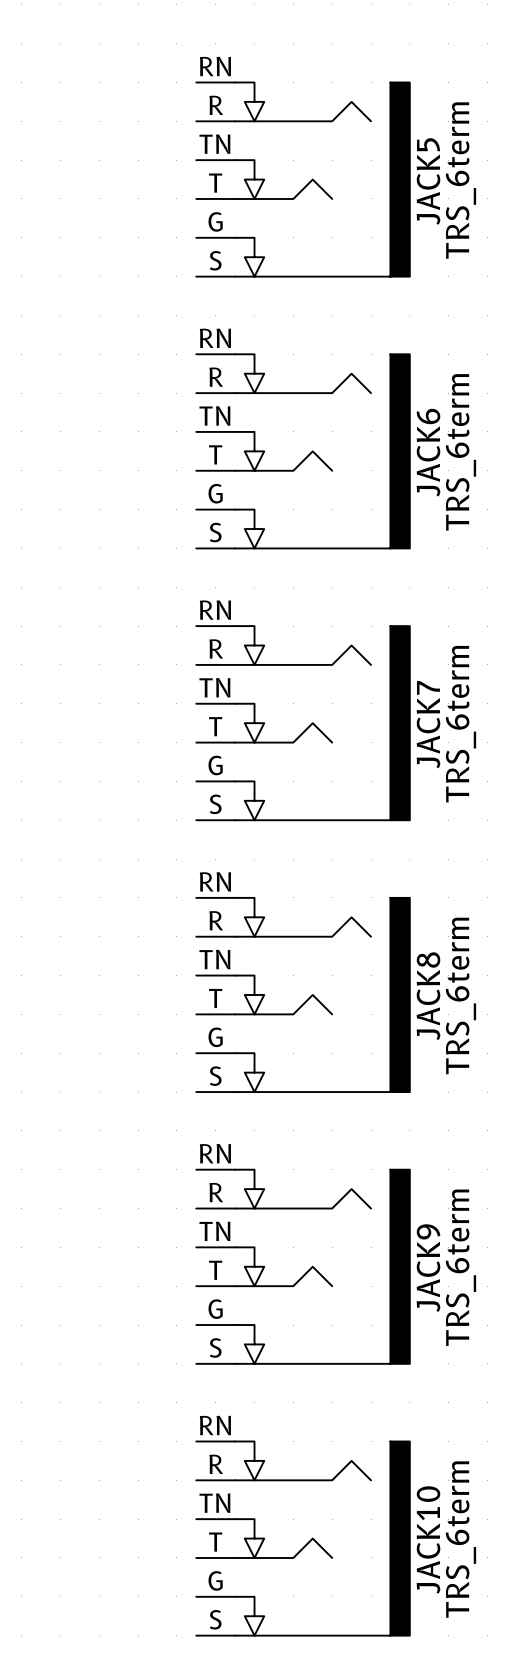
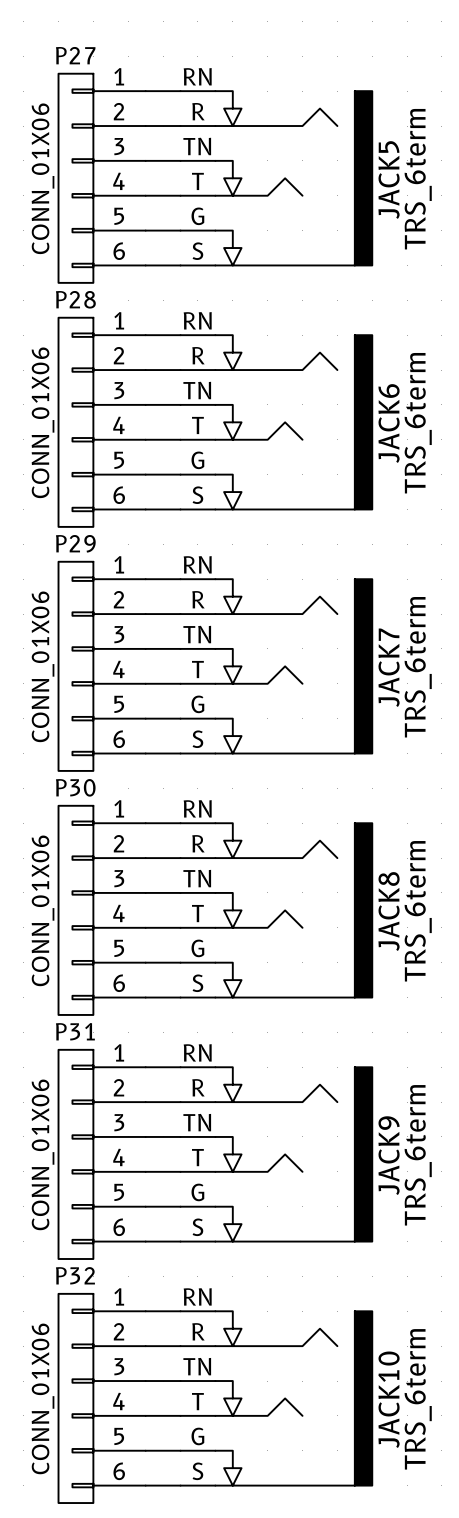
wire: none -> (145, 91) (180, 91)
wire: none -> (145, 126) (180, 126)
wire: none -> (145, 160) (180, 160)
P27: none -> CONN_01X06 (102, 178)
wire: none -> (145, 195) (180, 195)
wire: none -> (145, 230) (180, 230)
wire: none -> (145, 265) (180, 265)
wire: none -> (145, 335) (180, 335)
wire: none -> (145, 370) (180, 370)
wire: none -> (145, 404) (180, 404)
P28: none -> CONN_01X06 (102, 422)
wire: none -> (145, 439) (180, 439)
wire: none -> (145, 474) (180, 474)
wire: none -> (145, 509) (180, 509)
wire: none -> (145, 579) (180, 579)
wire: none -> (145, 614) (180, 614)
wire: none -> (145, 648) (180, 648)
P29: none -> CONN_01X06 (102, 666)
wire: none -> (145, 683) (180, 683)
wire: none -> (145, 718) (180, 718)
wire: none -> (145, 753) (180, 753)
wire: none -> (145, 823) (180, 823)
wire: none -> (145, 858) (180, 858)
wire: none -> (145, 892) (180, 892)
P30: none -> CONN_01X06 (102, 910)
wire: none -> (145, 927) (180, 927)
wire: none -> (145, 962) (180, 962)
wire: none -> (145, 997) (180, 997)
wire: none -> (145, 1067) (180, 1067)
wire: none -> (145, 1102) (180, 1102)
wire: none -> (145, 1136) (180, 1136)
P31: none -> CONN_01X06 (102, 1154)
wire: none -> (145, 1171) (180, 1171)
wire: none -> (145, 1206) (180, 1206)
wire: none -> (145, 1241) (180, 1241)
wire: none -> (145, 1311) (180, 1311)
wire: none -> (145, 1346) (180, 1346)
wire: none -> (145, 1381) (180, 1381)
P32: none -> CONN_01X06 (102, 1398)
wire: none -> (145, 1415) (180, 1415)
wire: none -> (145, 1450) (180, 1450)
wire: none -> (145, 1485) (180, 1485)

